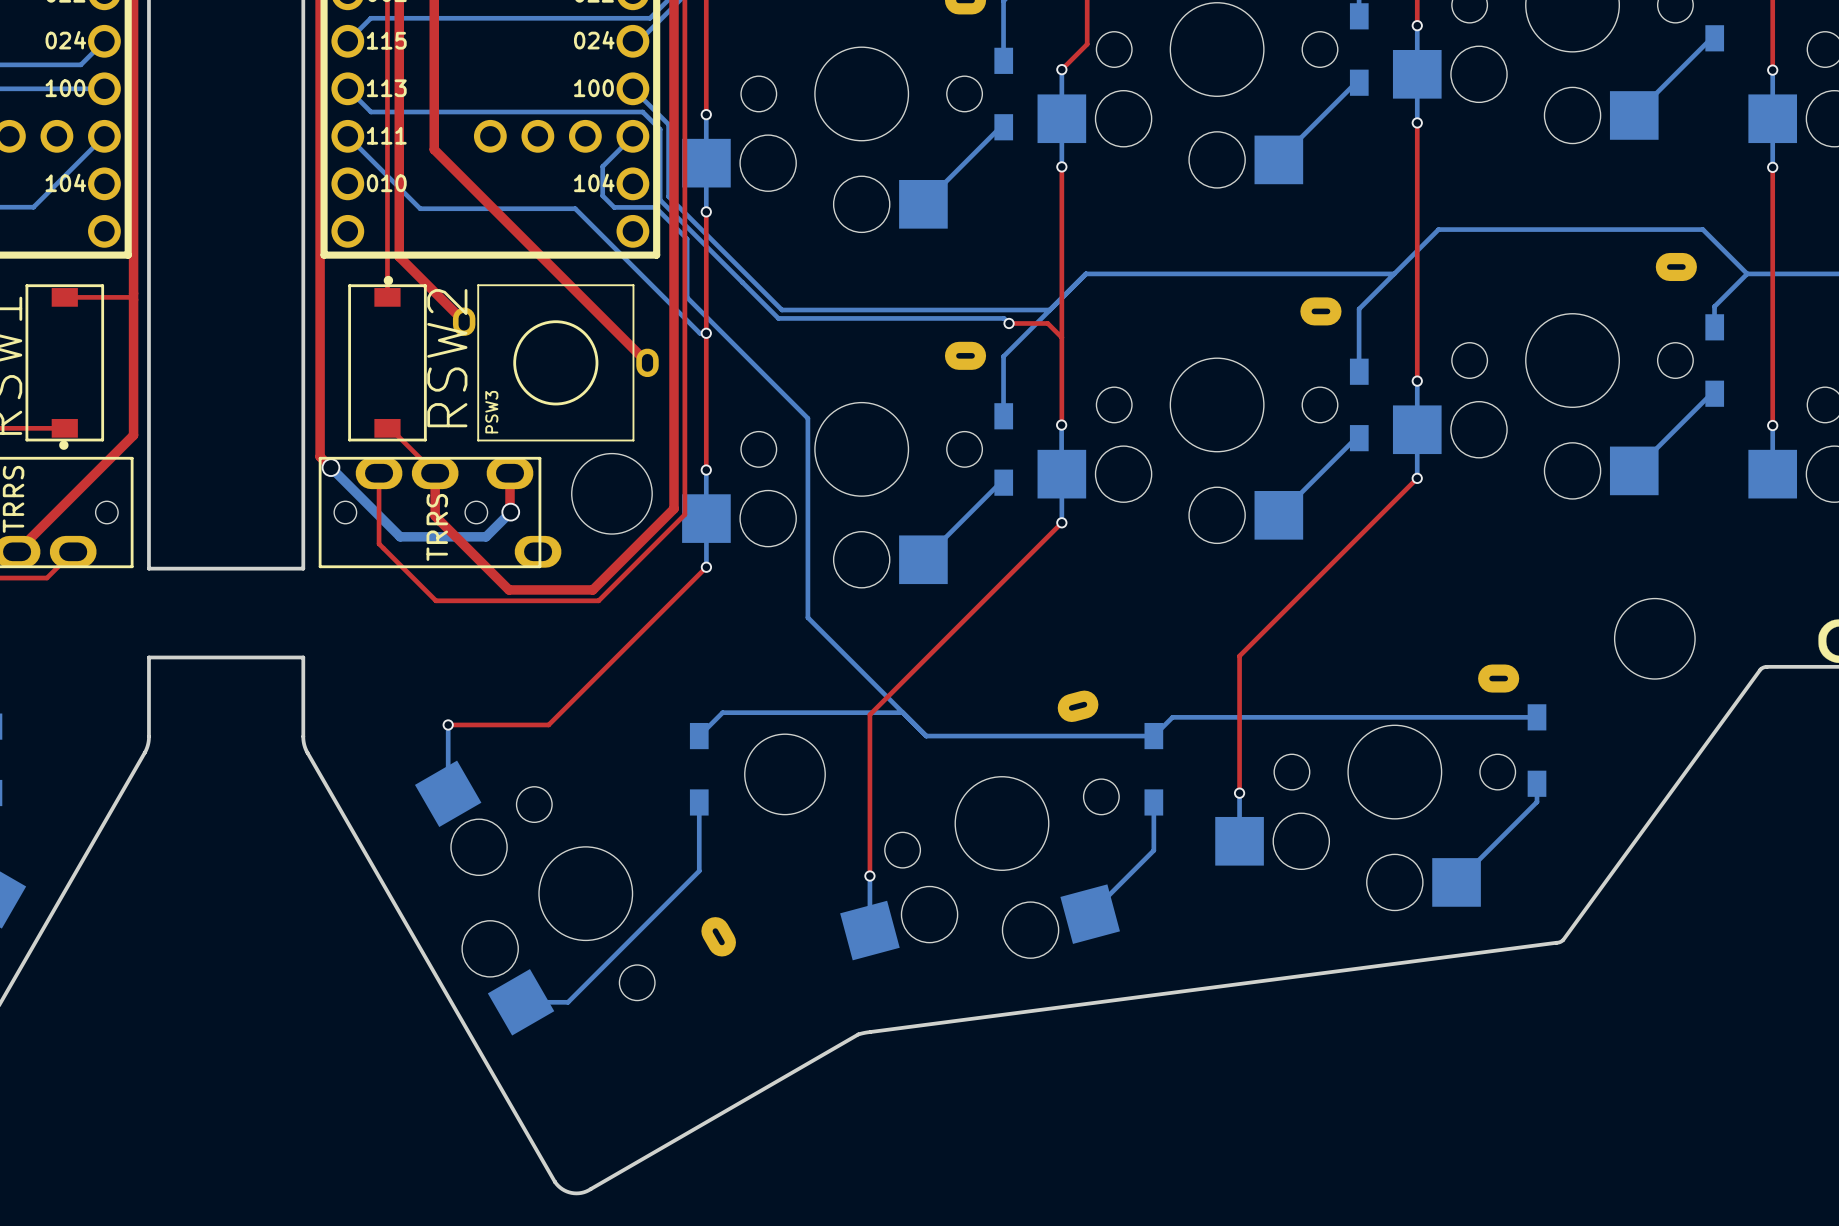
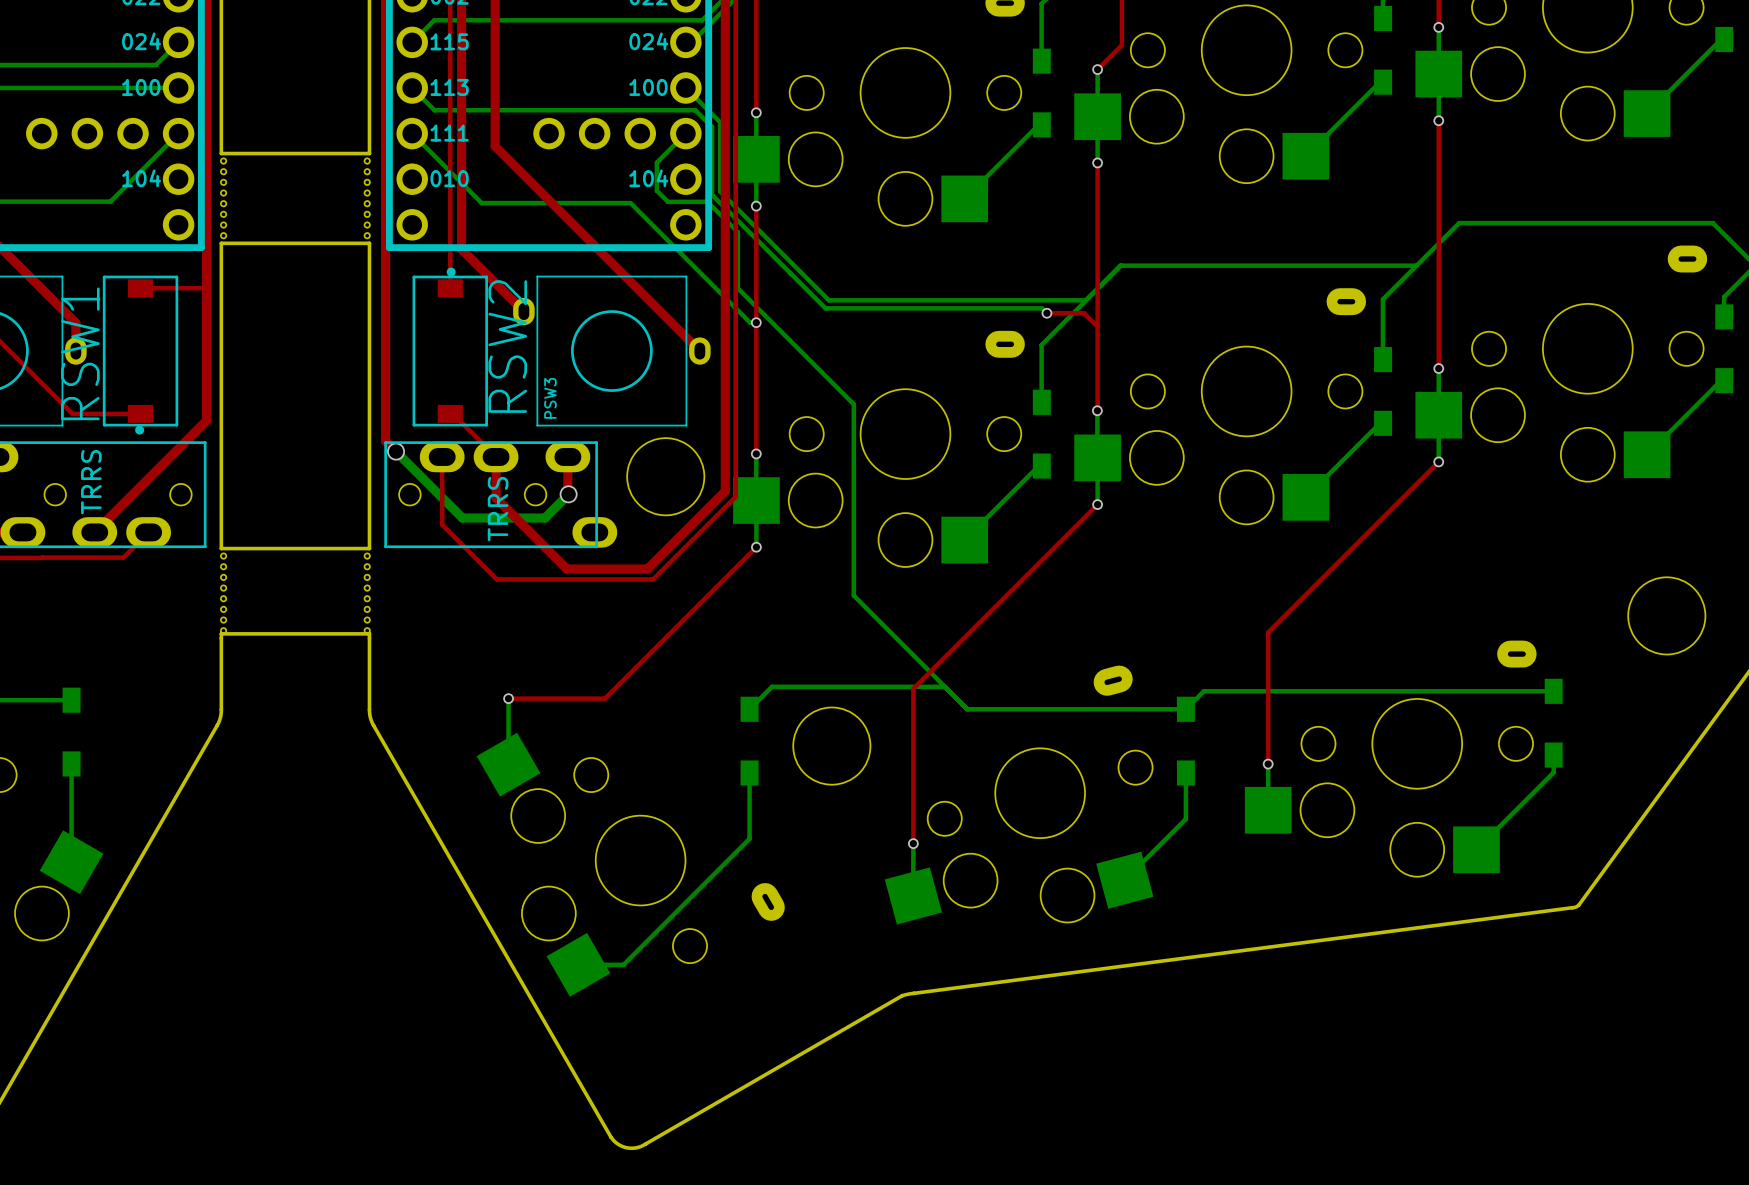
board edge: (148, 157) (148, 250) -> (221, 153) (369, 153)
board edge: (303, 157) (303, 250) -> (221, 243) (369, 243)
part: none -> (223, 198)
part: none -> (367, 198)
part: none -> (223, 593)
part: none -> (367, 593)

